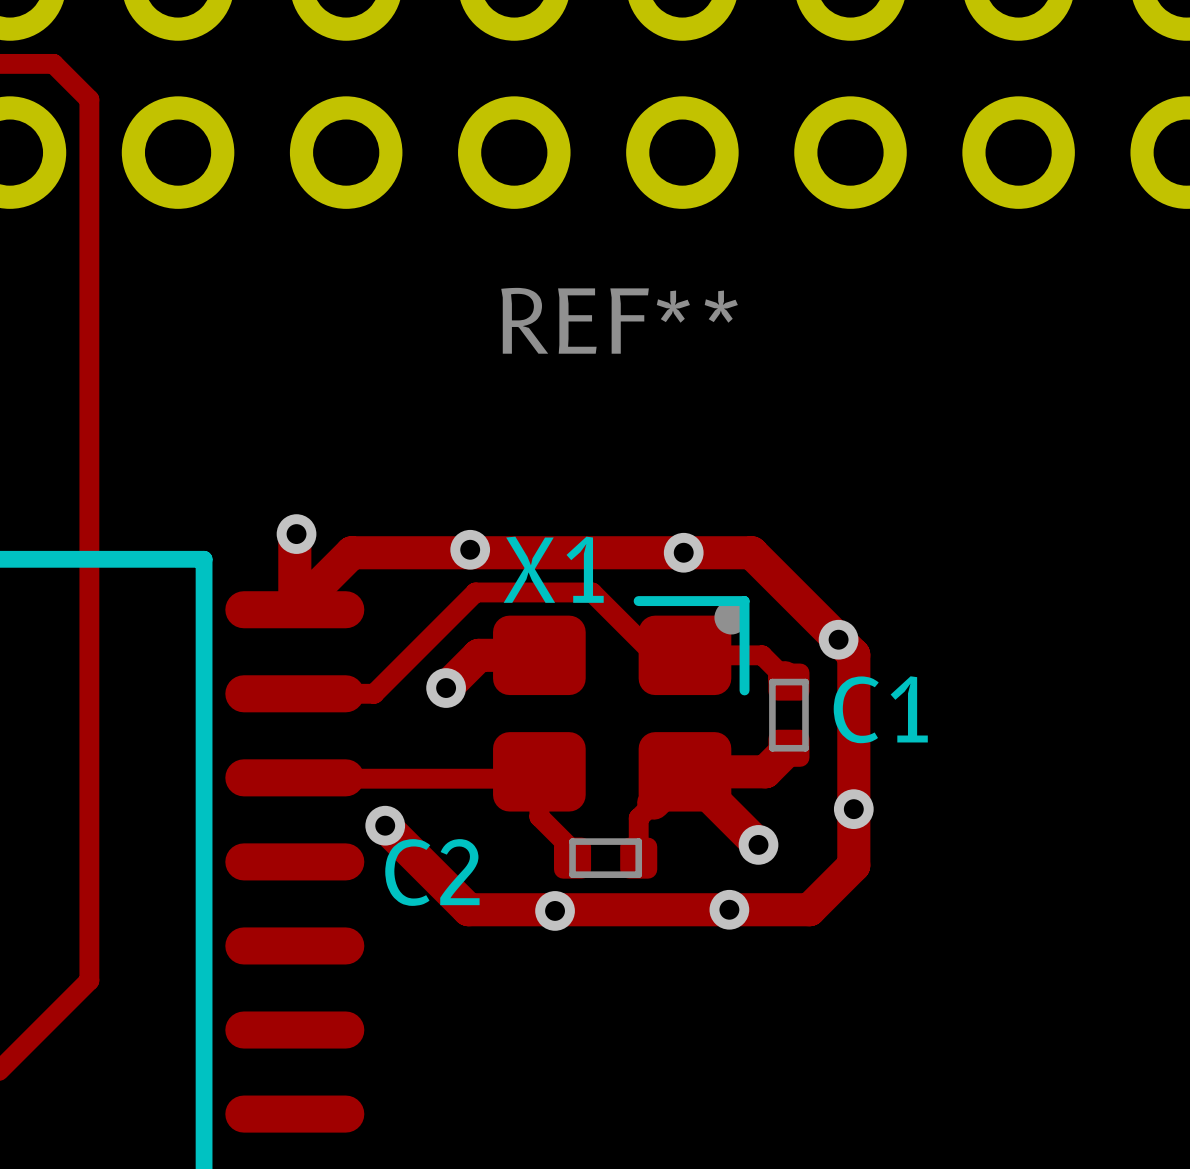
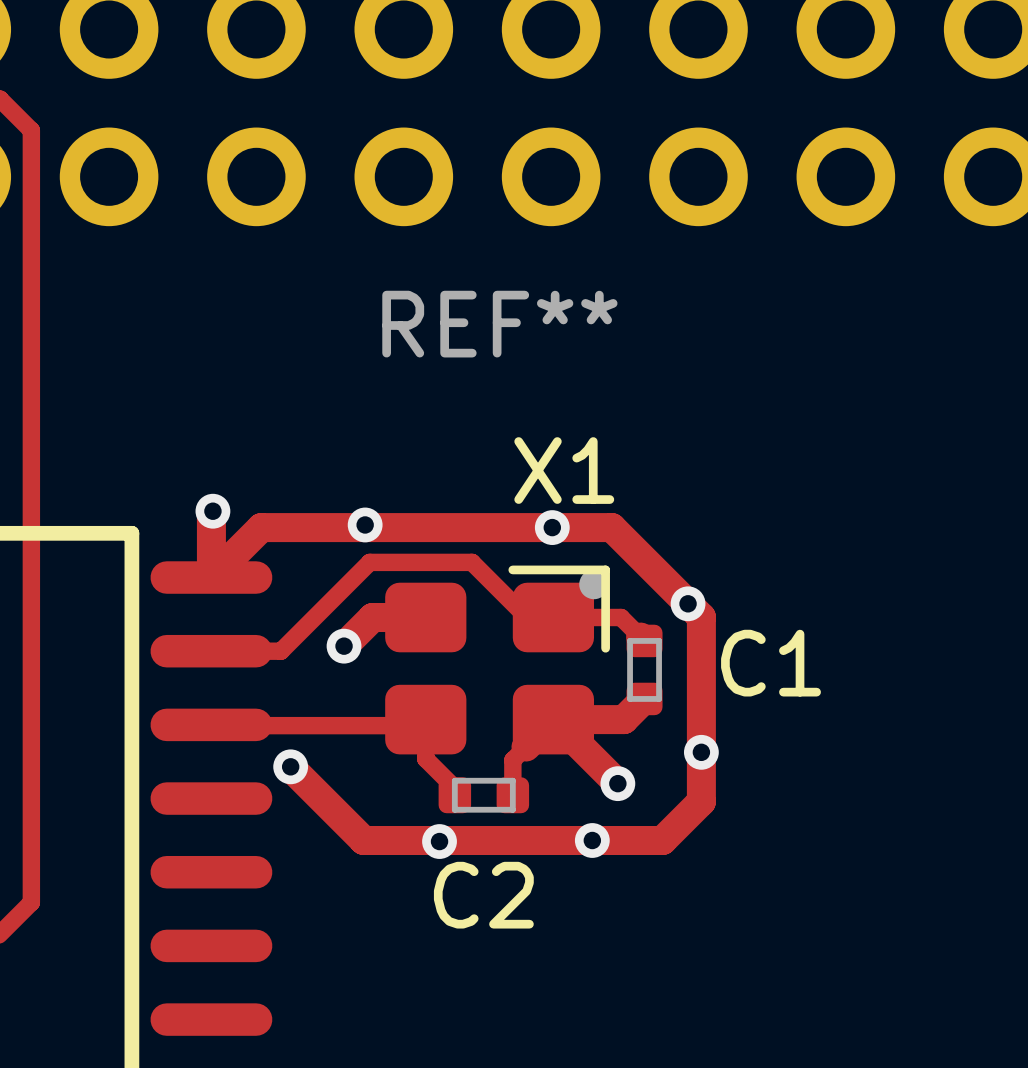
X1 name position: X1 (553, 569) -> X1 (564, 470)
C1 name position: C1 (880, 709) -> C1 (771, 663)
C2 name position: C2 (432, 872) -> C2 (483, 895)

